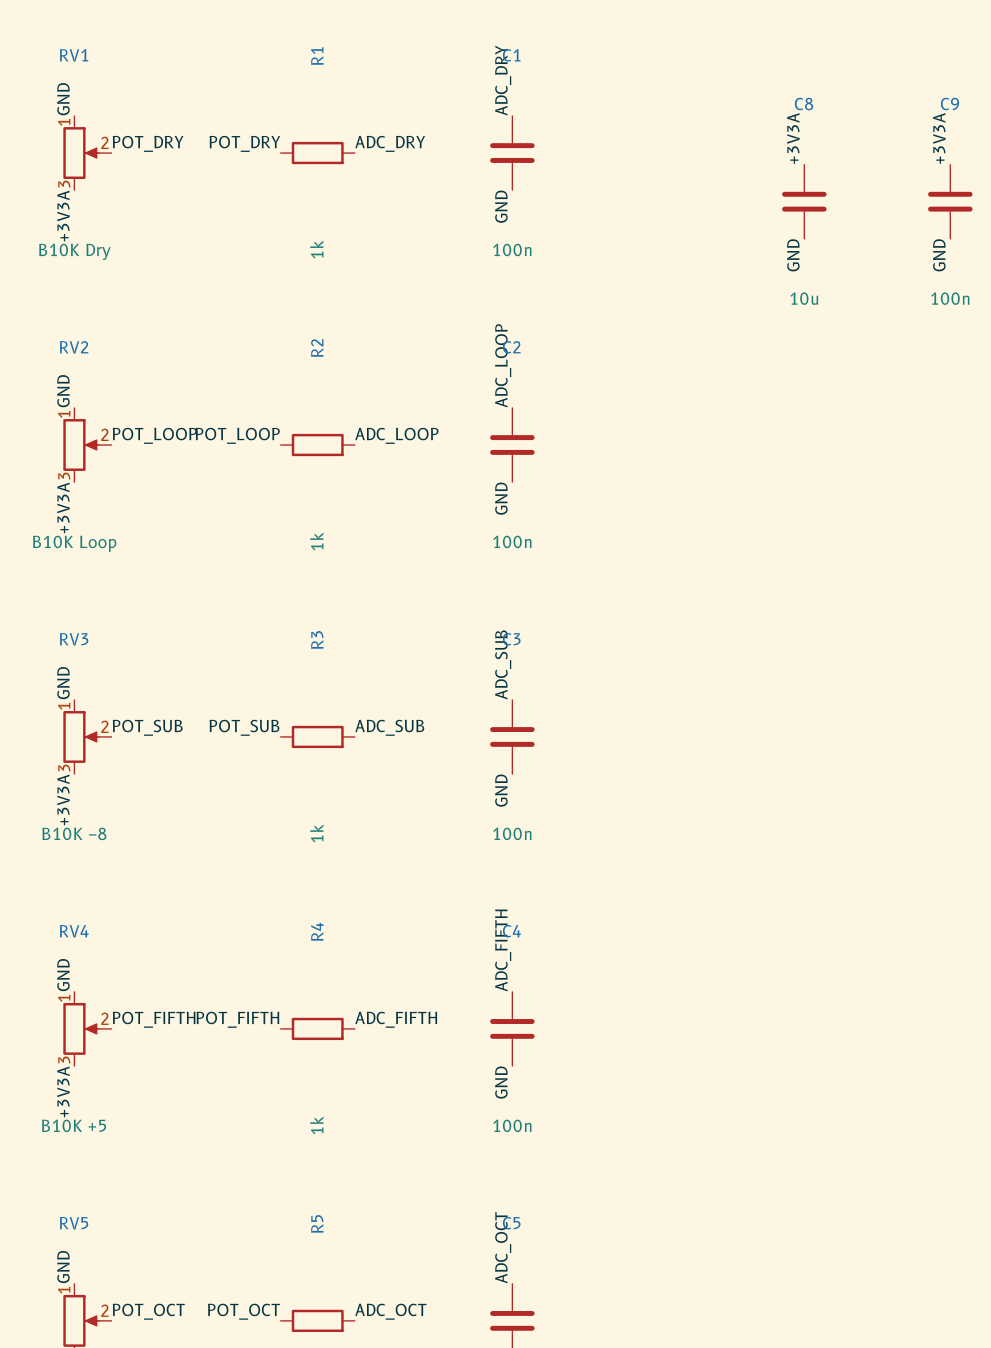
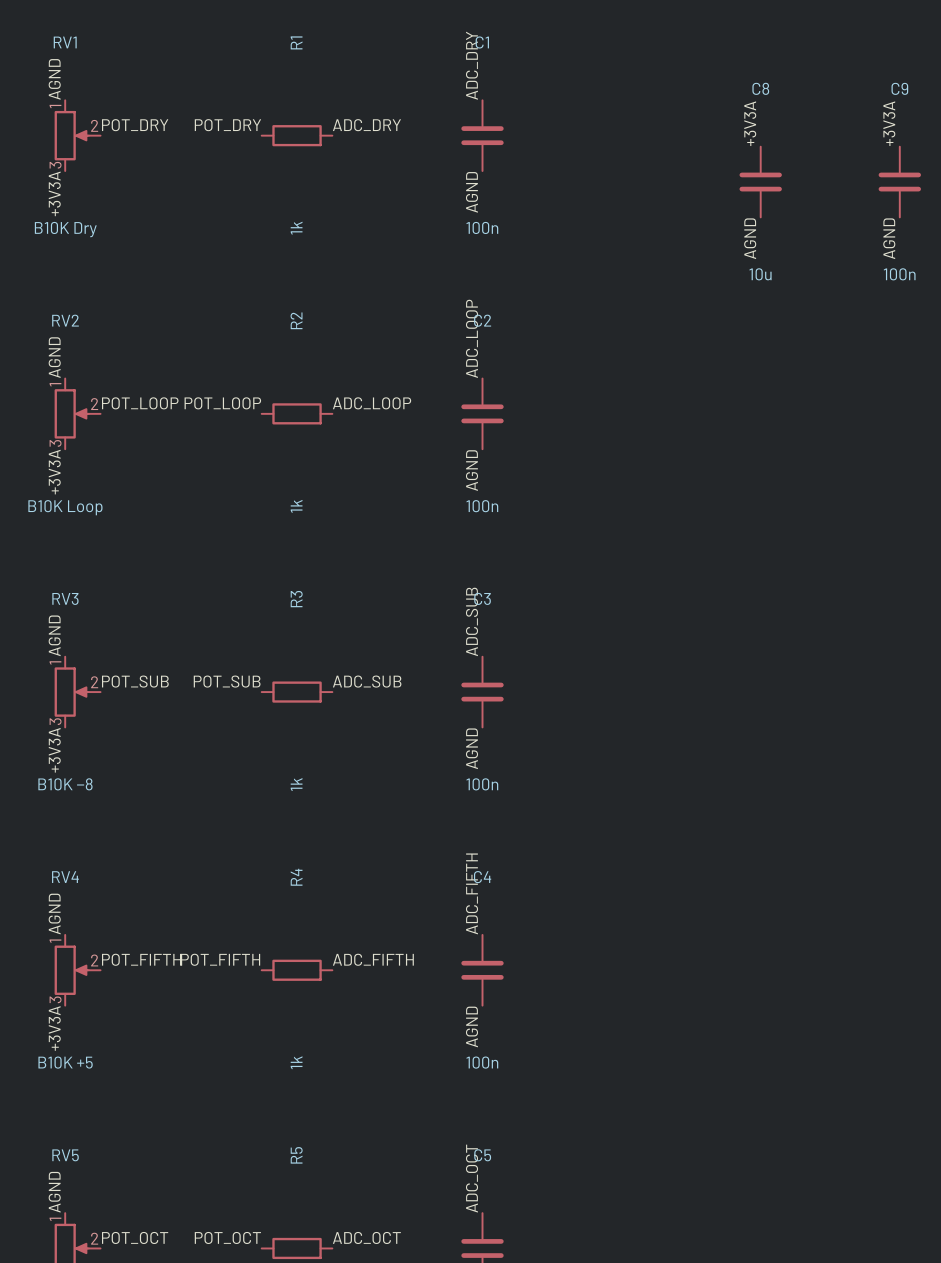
label: GND (63, 99) -> AGND (54, 79)
label: GND (501, 206) -> AGND (471, 192)
label: GND (793, 255) -> AGND (750, 238)
label: GND (939, 255) -> AGND (889, 238)
label: GND (63, 391) -> AGND (54, 357)
label: GND (501, 498) -> AGND (471, 470)
label: GND (63, 683) -> AGND (54, 635)
label: GND (501, 790) -> AGND (471, 748)
label: GND (63, 975) -> AGND (54, 914)
label: GND (501, 1082) -> AGND (471, 1026)
label: GND (63, 1267) -> AGND (54, 1192)

